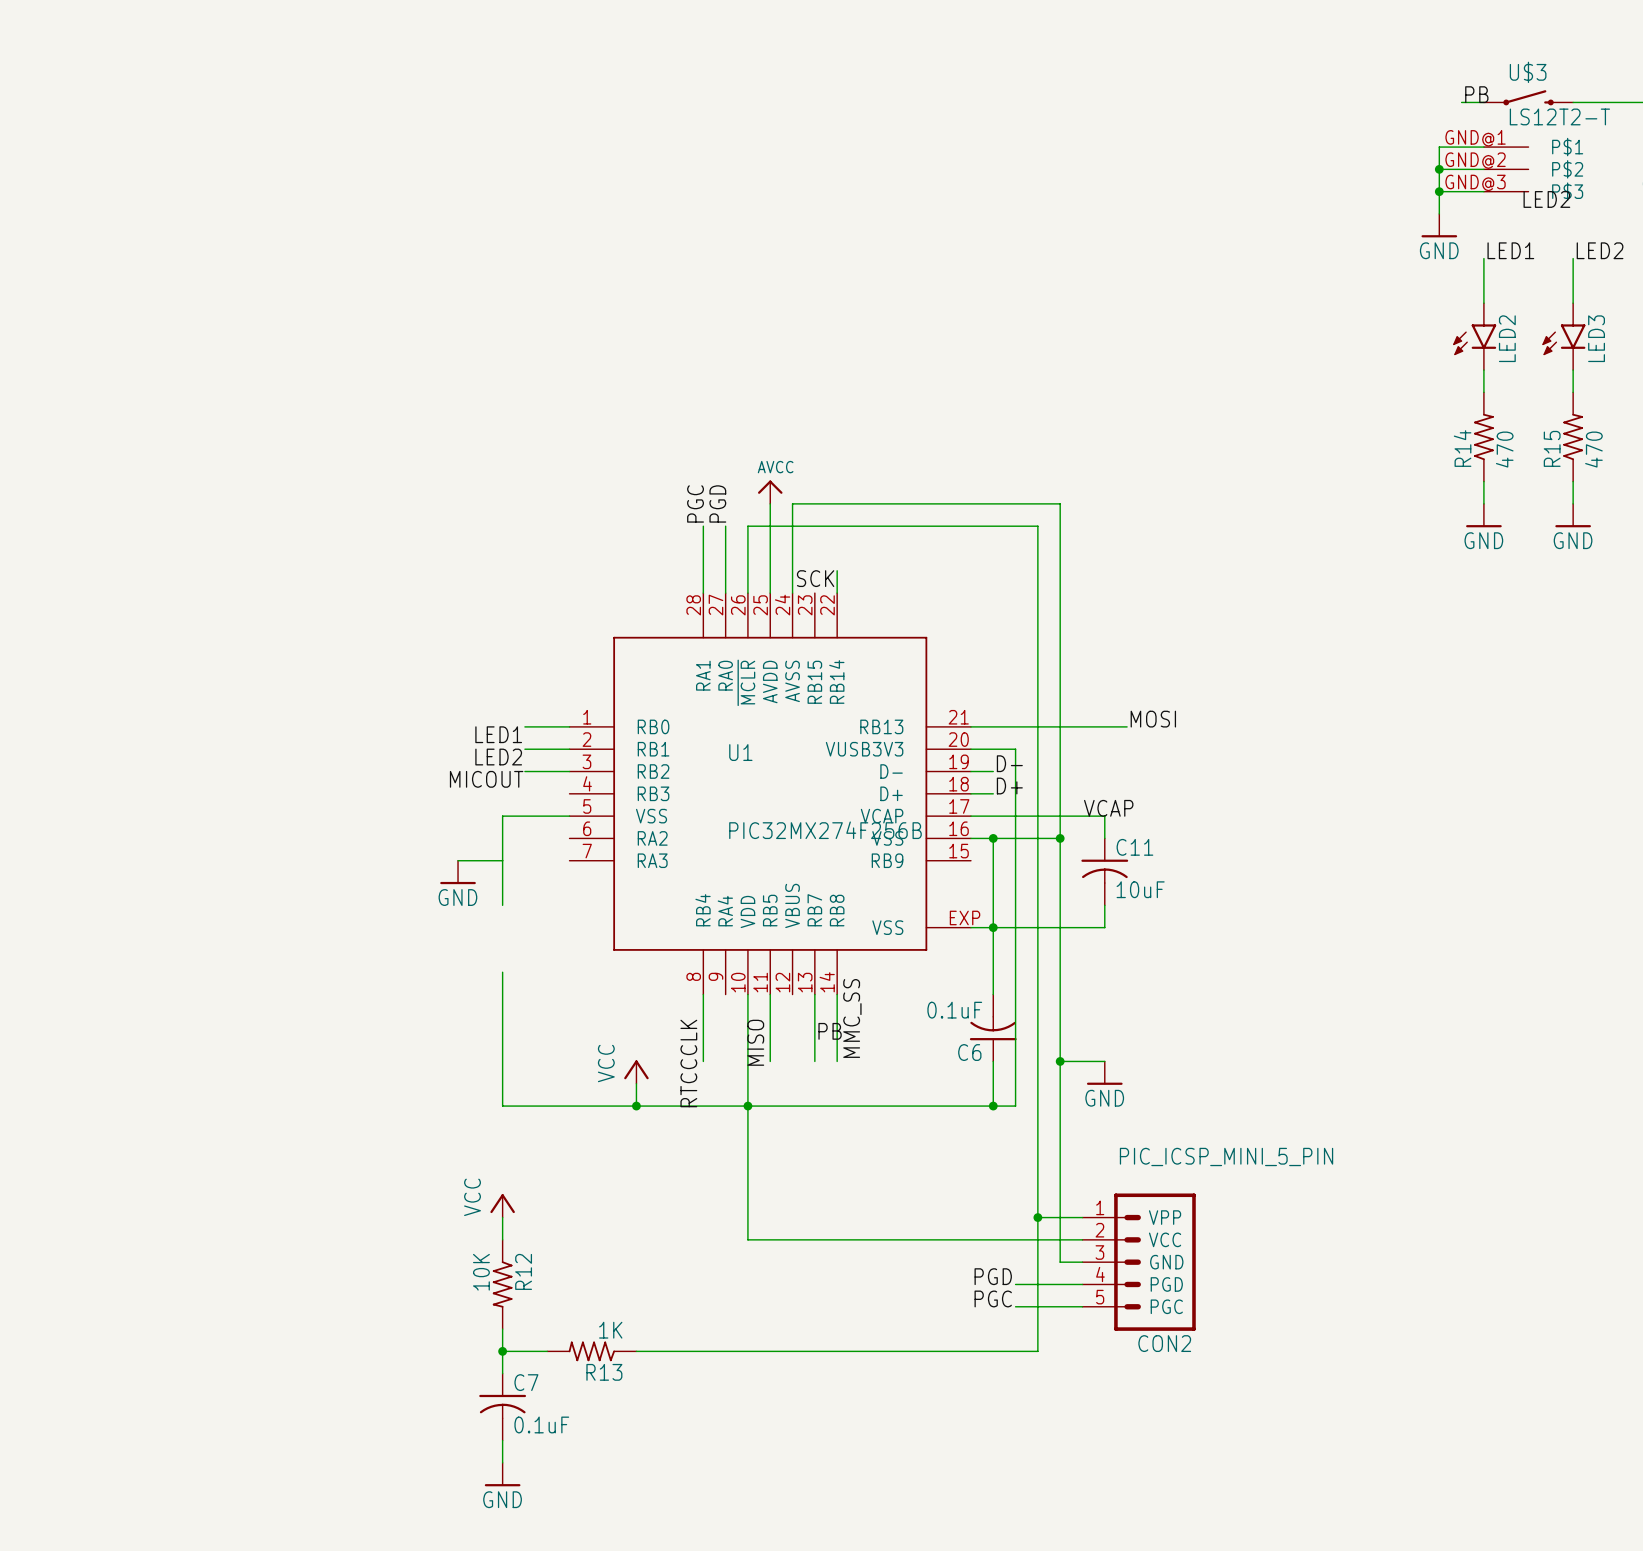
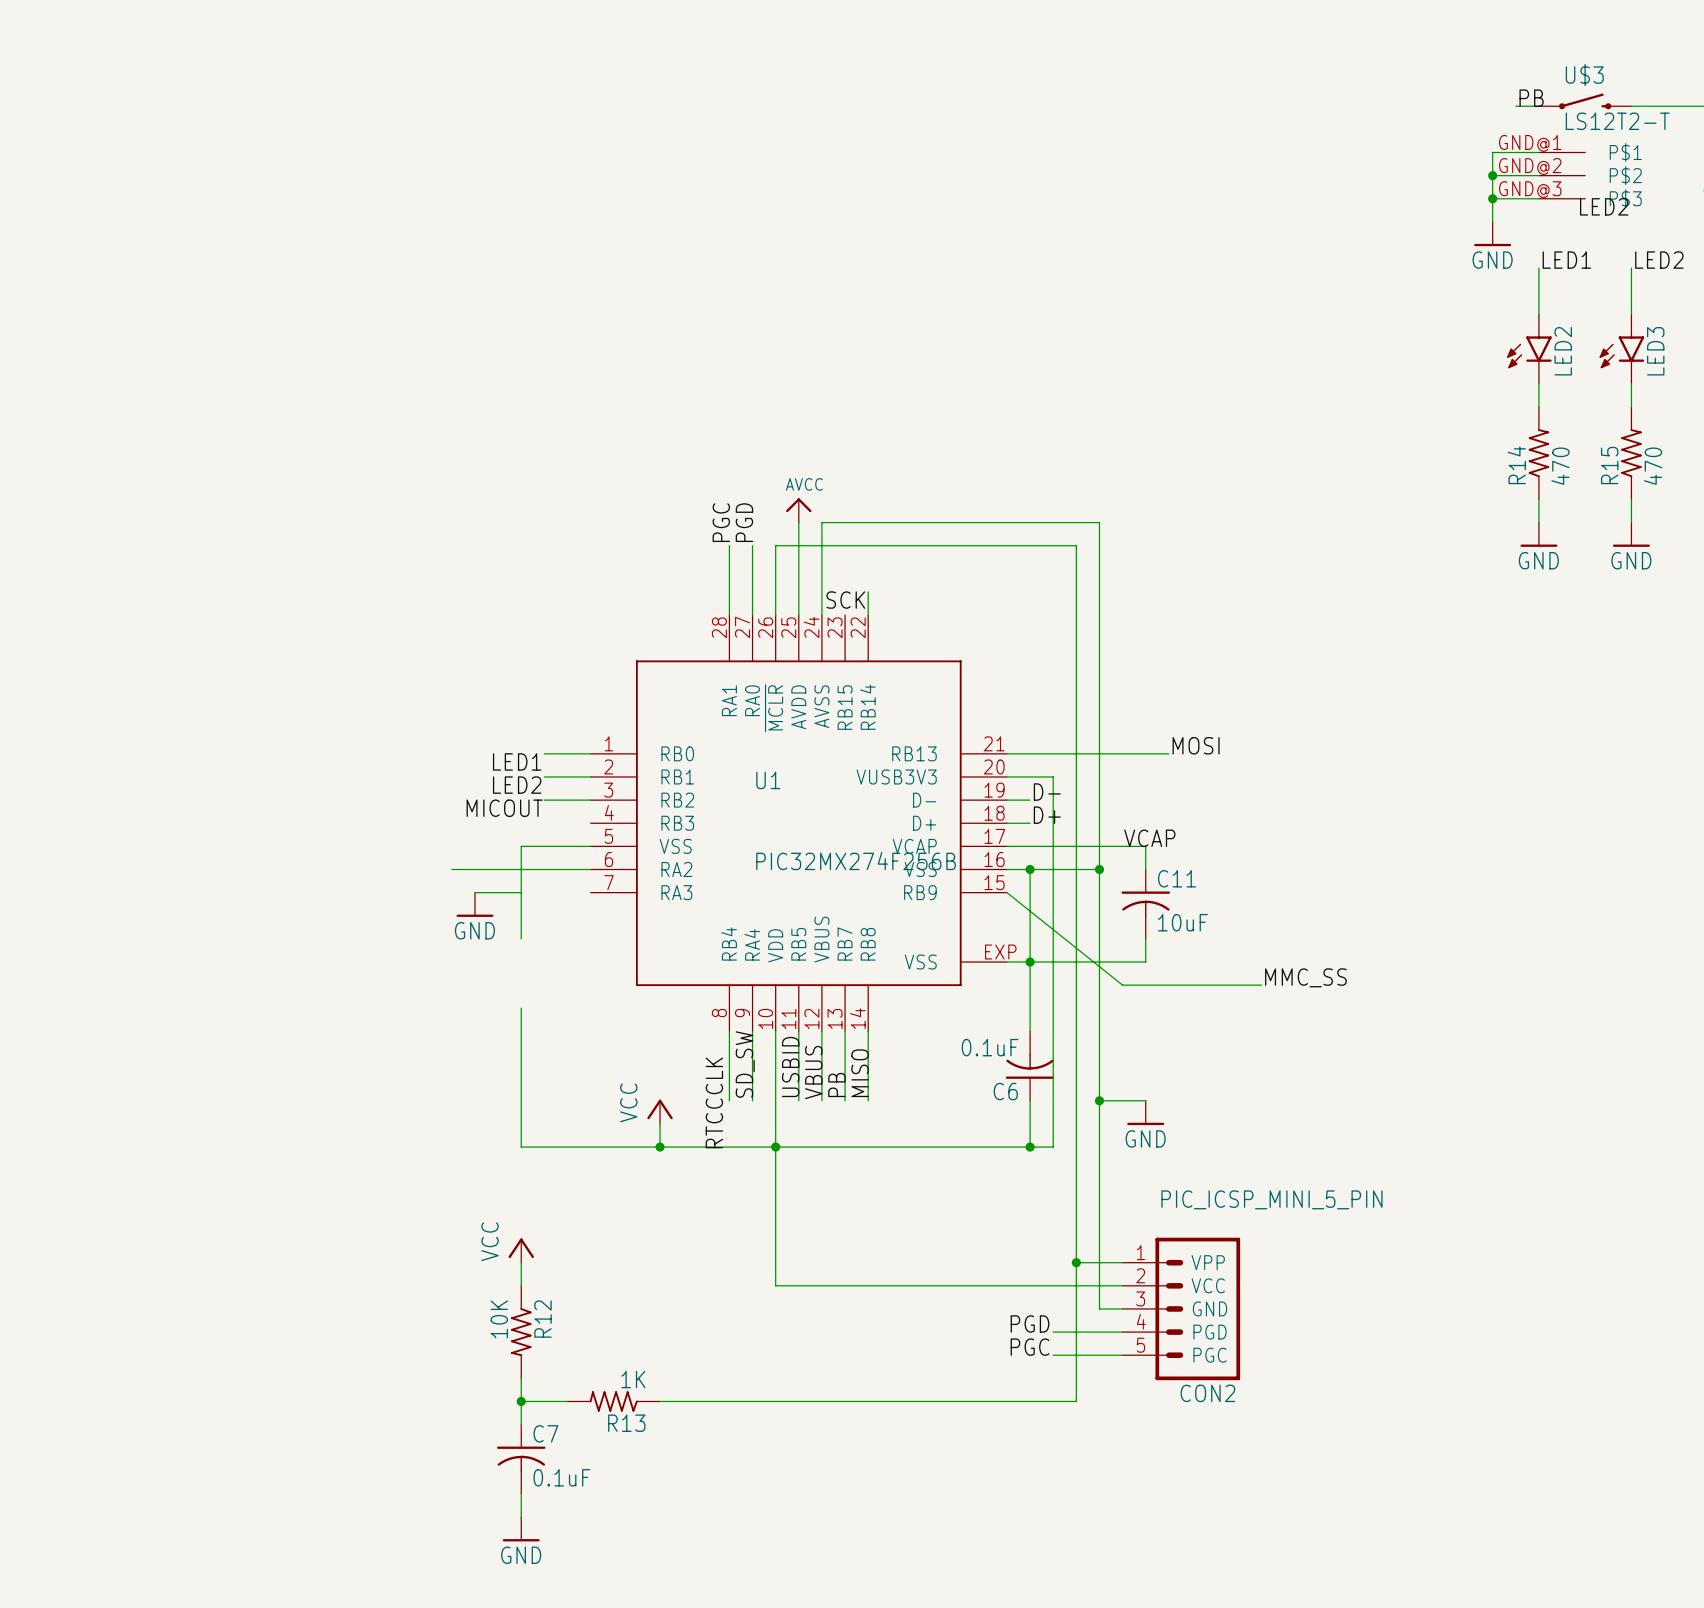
wire: none -> (451, 869) (590, 869)
wire: none -> (1006, 892) (1122, 985) (1261, 985)
label: none -> MMC_SS (1305, 977)
wire: none -> (752, 1031) (752, 1100)
wire: none -> (821, 1031) (821, 1100)
label: MMC_SS (852, 1018) -> none
label: none -> SD_SW (745, 1064)
label: none -> USBID (790, 1066)
label rotation: 0° (830, 1031) -> 90° counterclockwise (836, 1085)
label: none -> VBUS (813, 1072)
label position: MISO (755, 1042) -> MISO (860, 1073)

